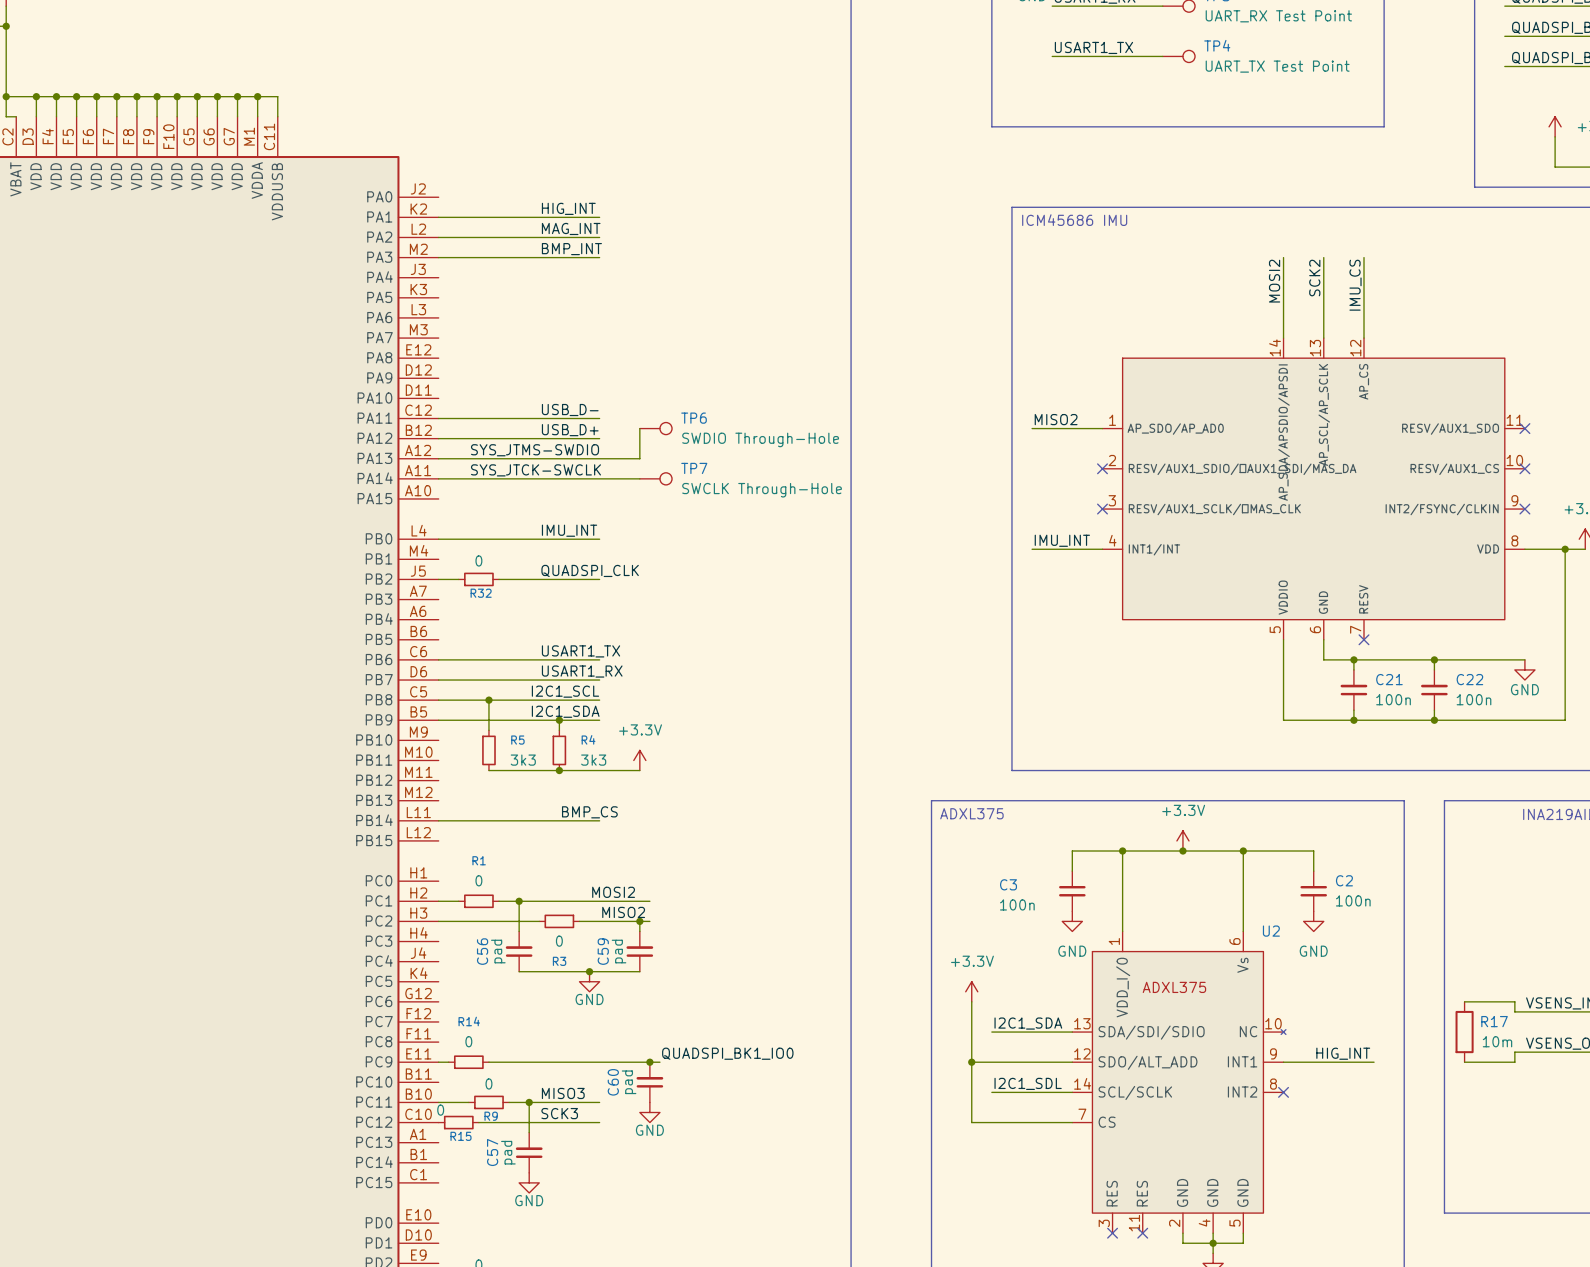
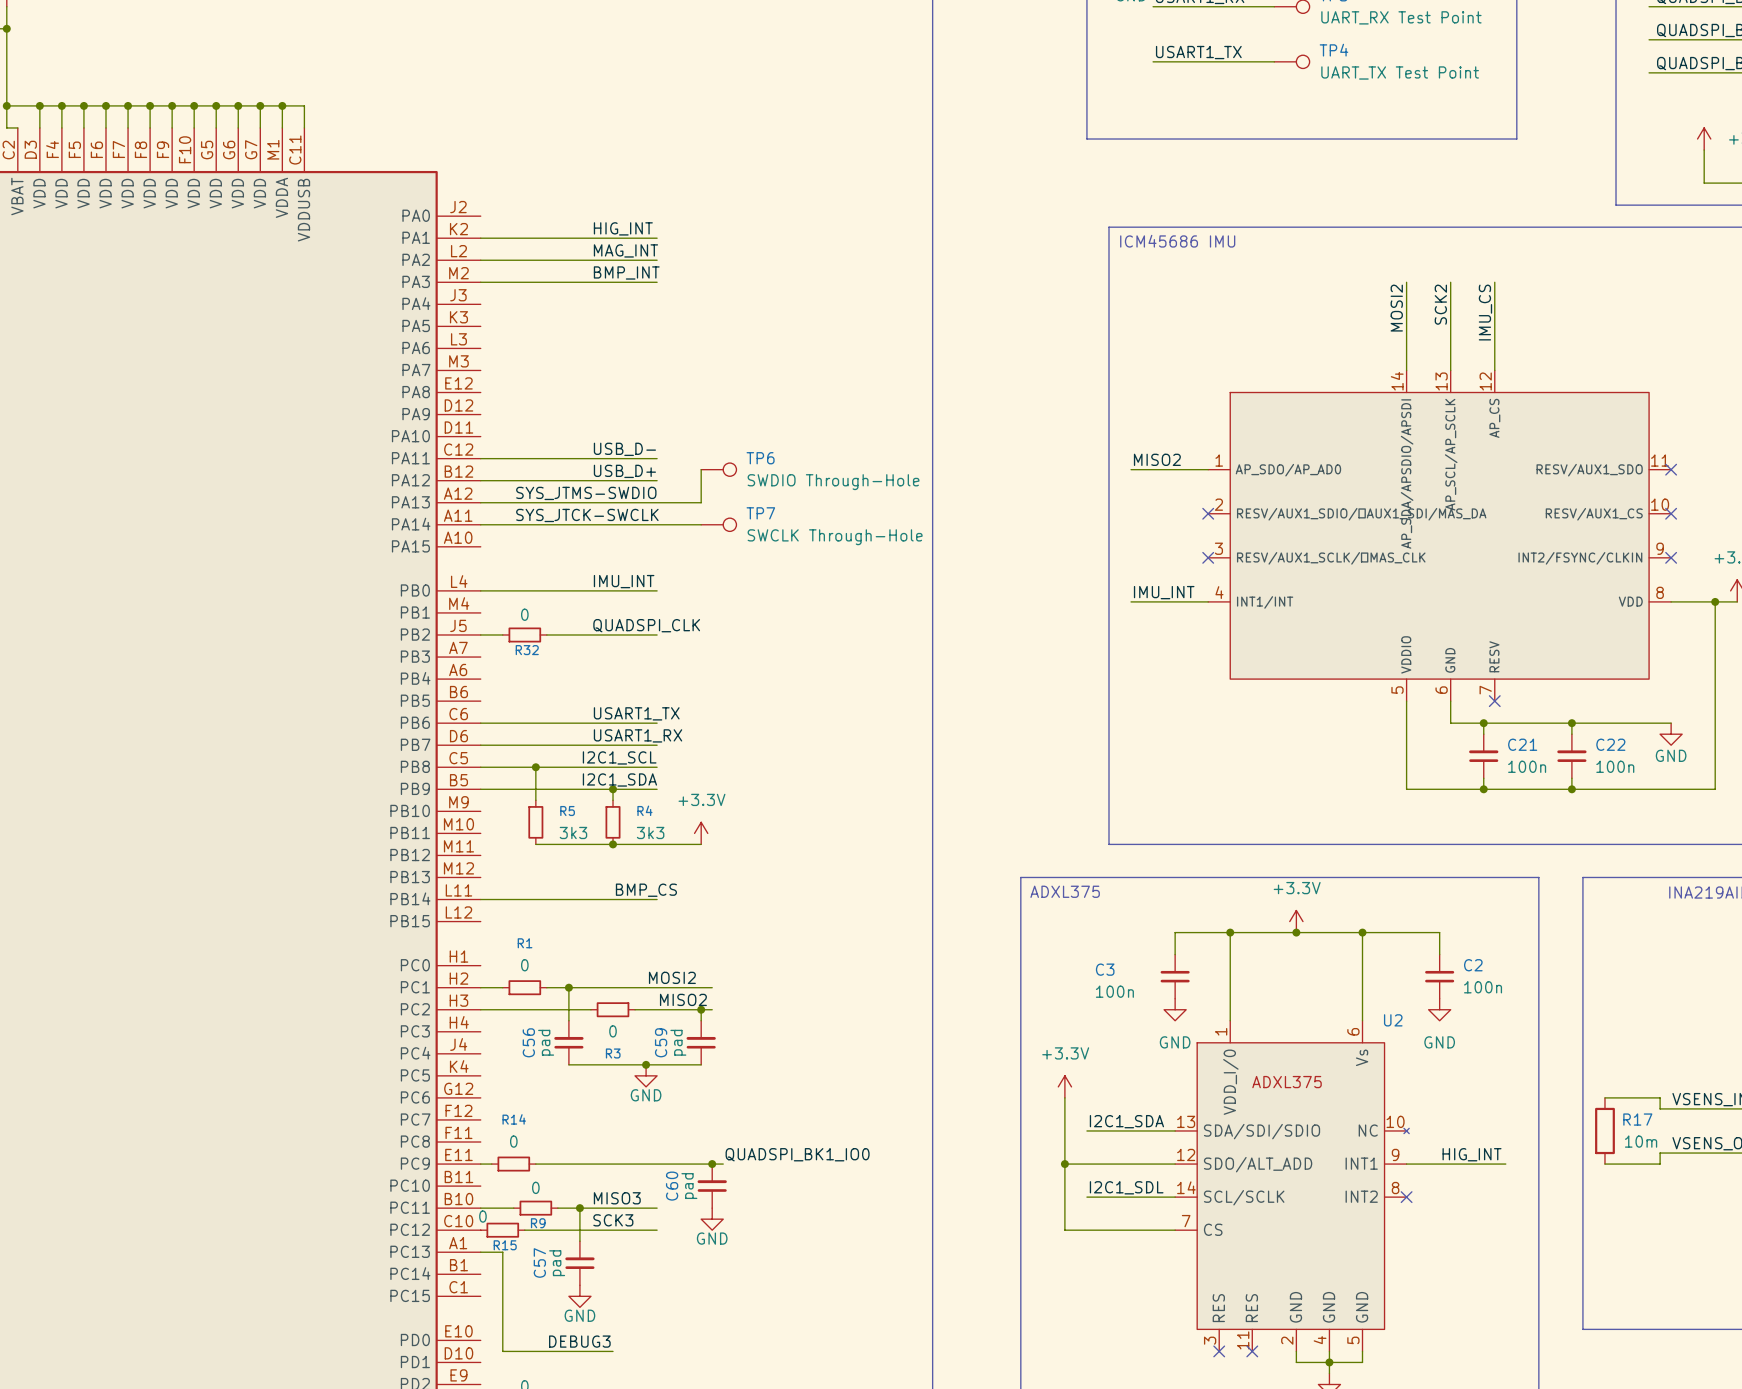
wire: none -> (480, 1252) (502, 1252) (502, 1351) (613, 1351)
label: none -> DEBUG3 (579, 1341)

